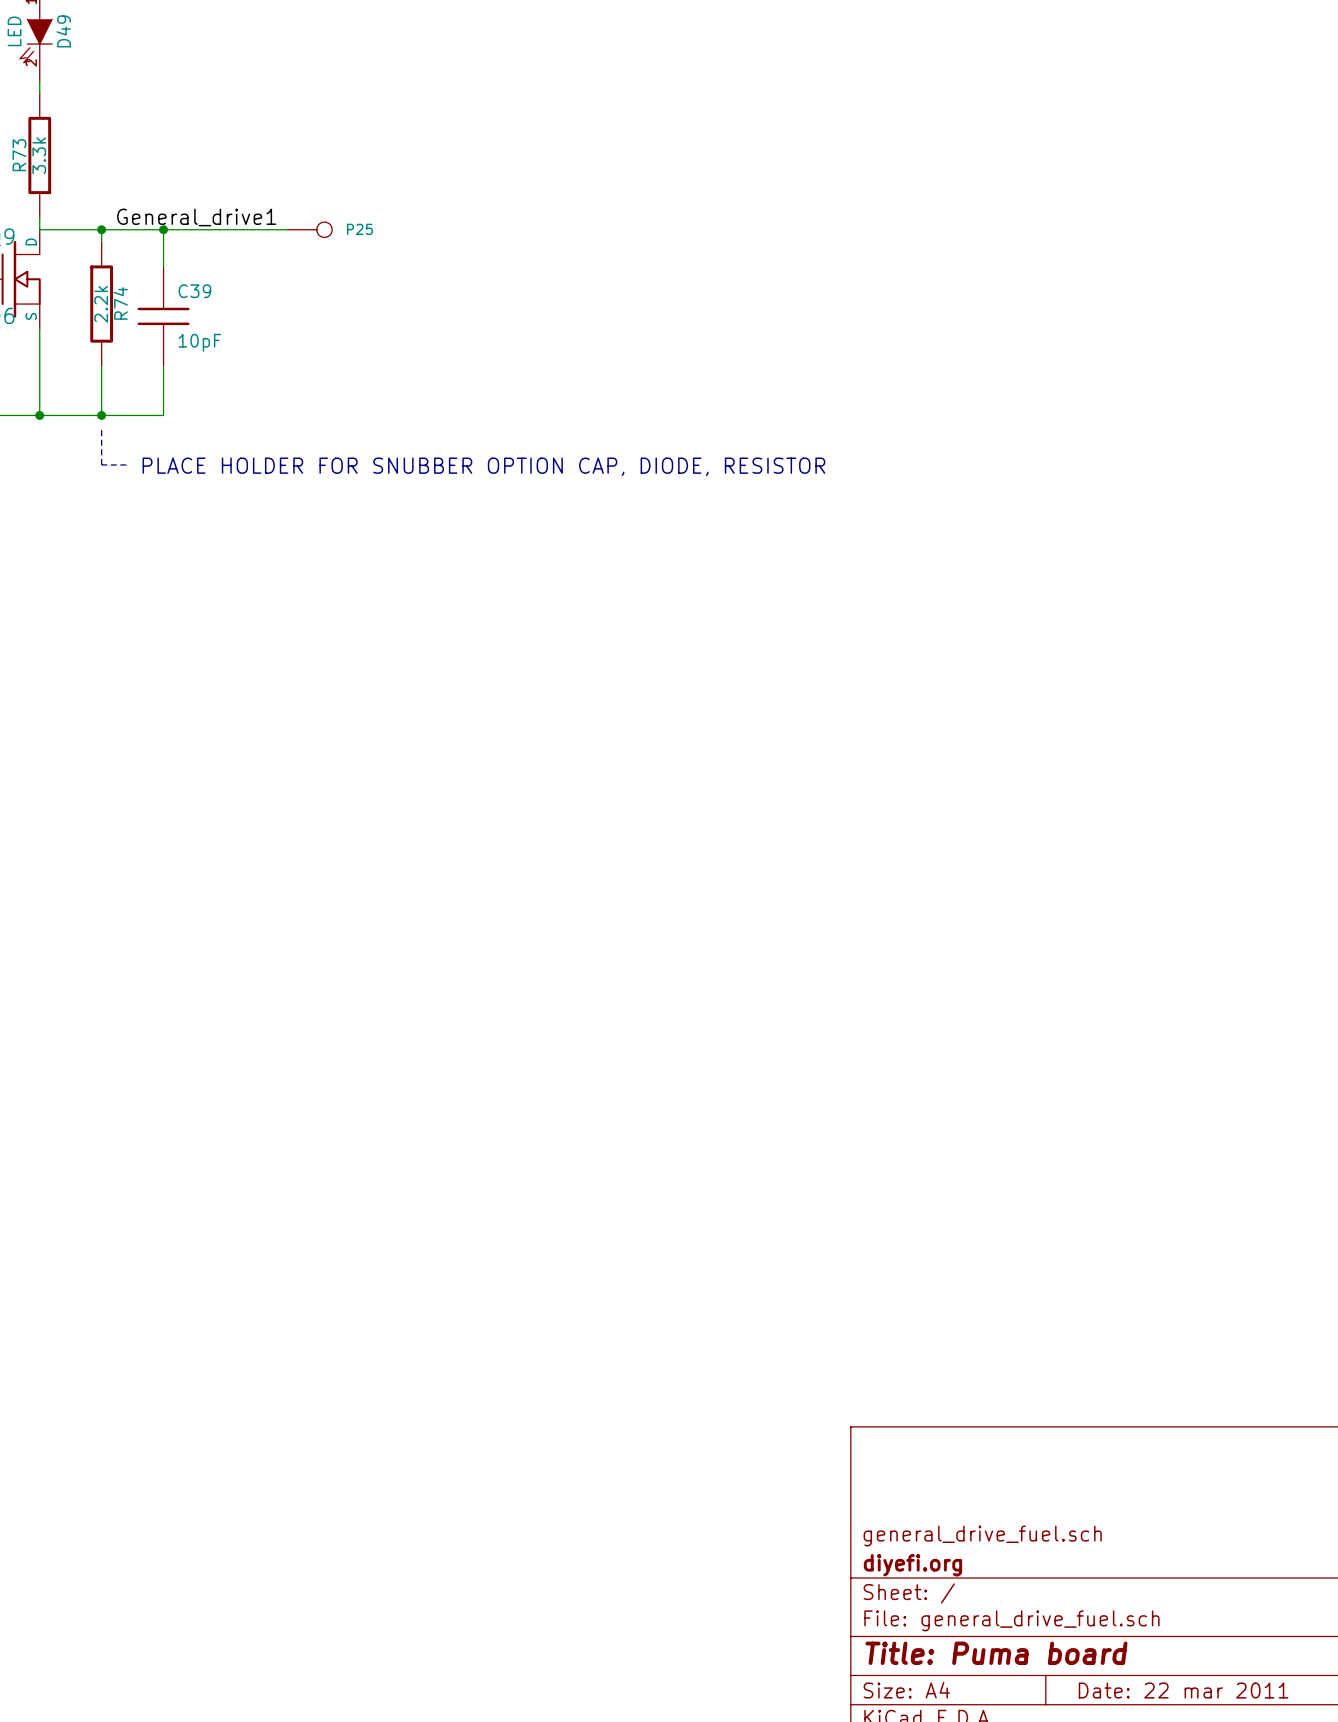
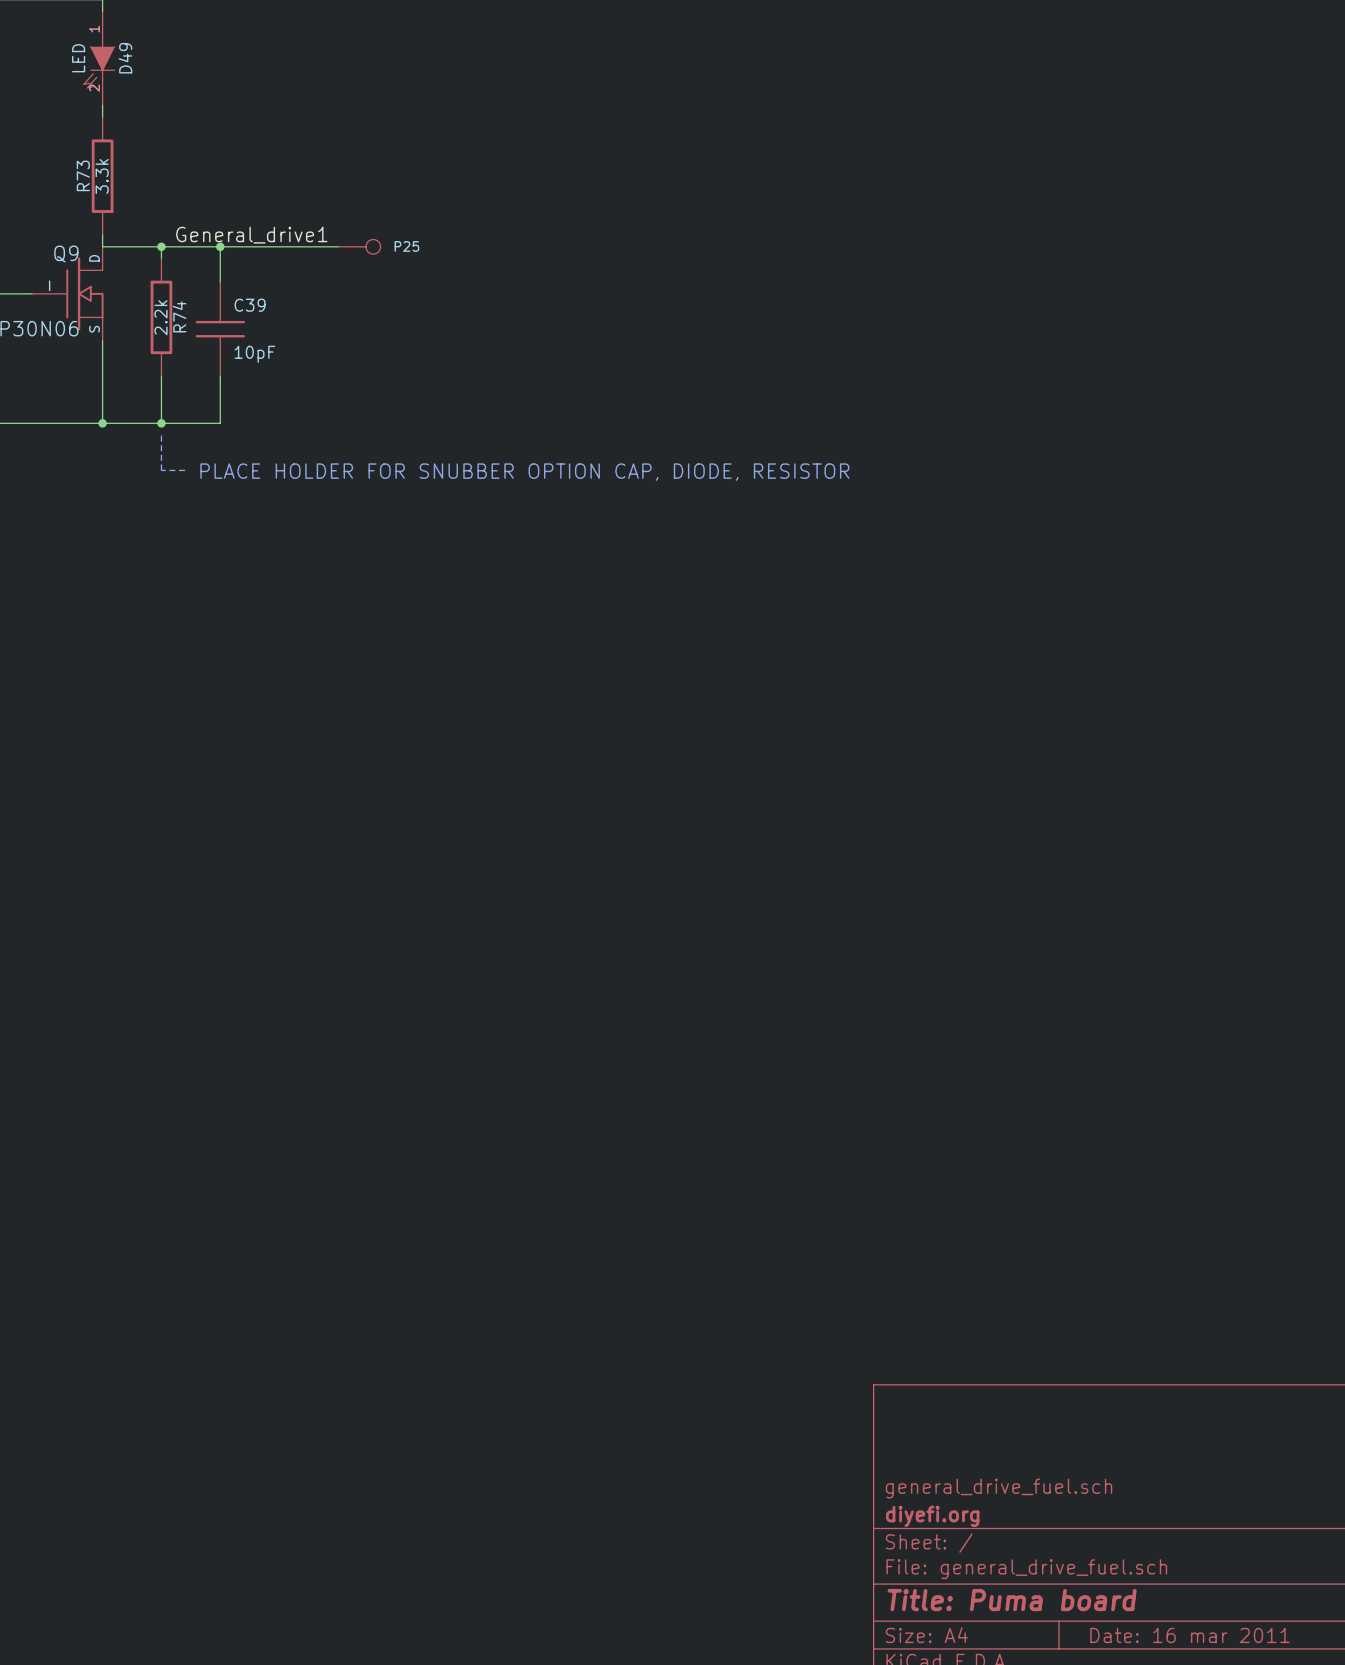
title block: Date: 22 mar 2011 (1183, 1690) -> Date: 16 mar 2011 (1189, 1635)

